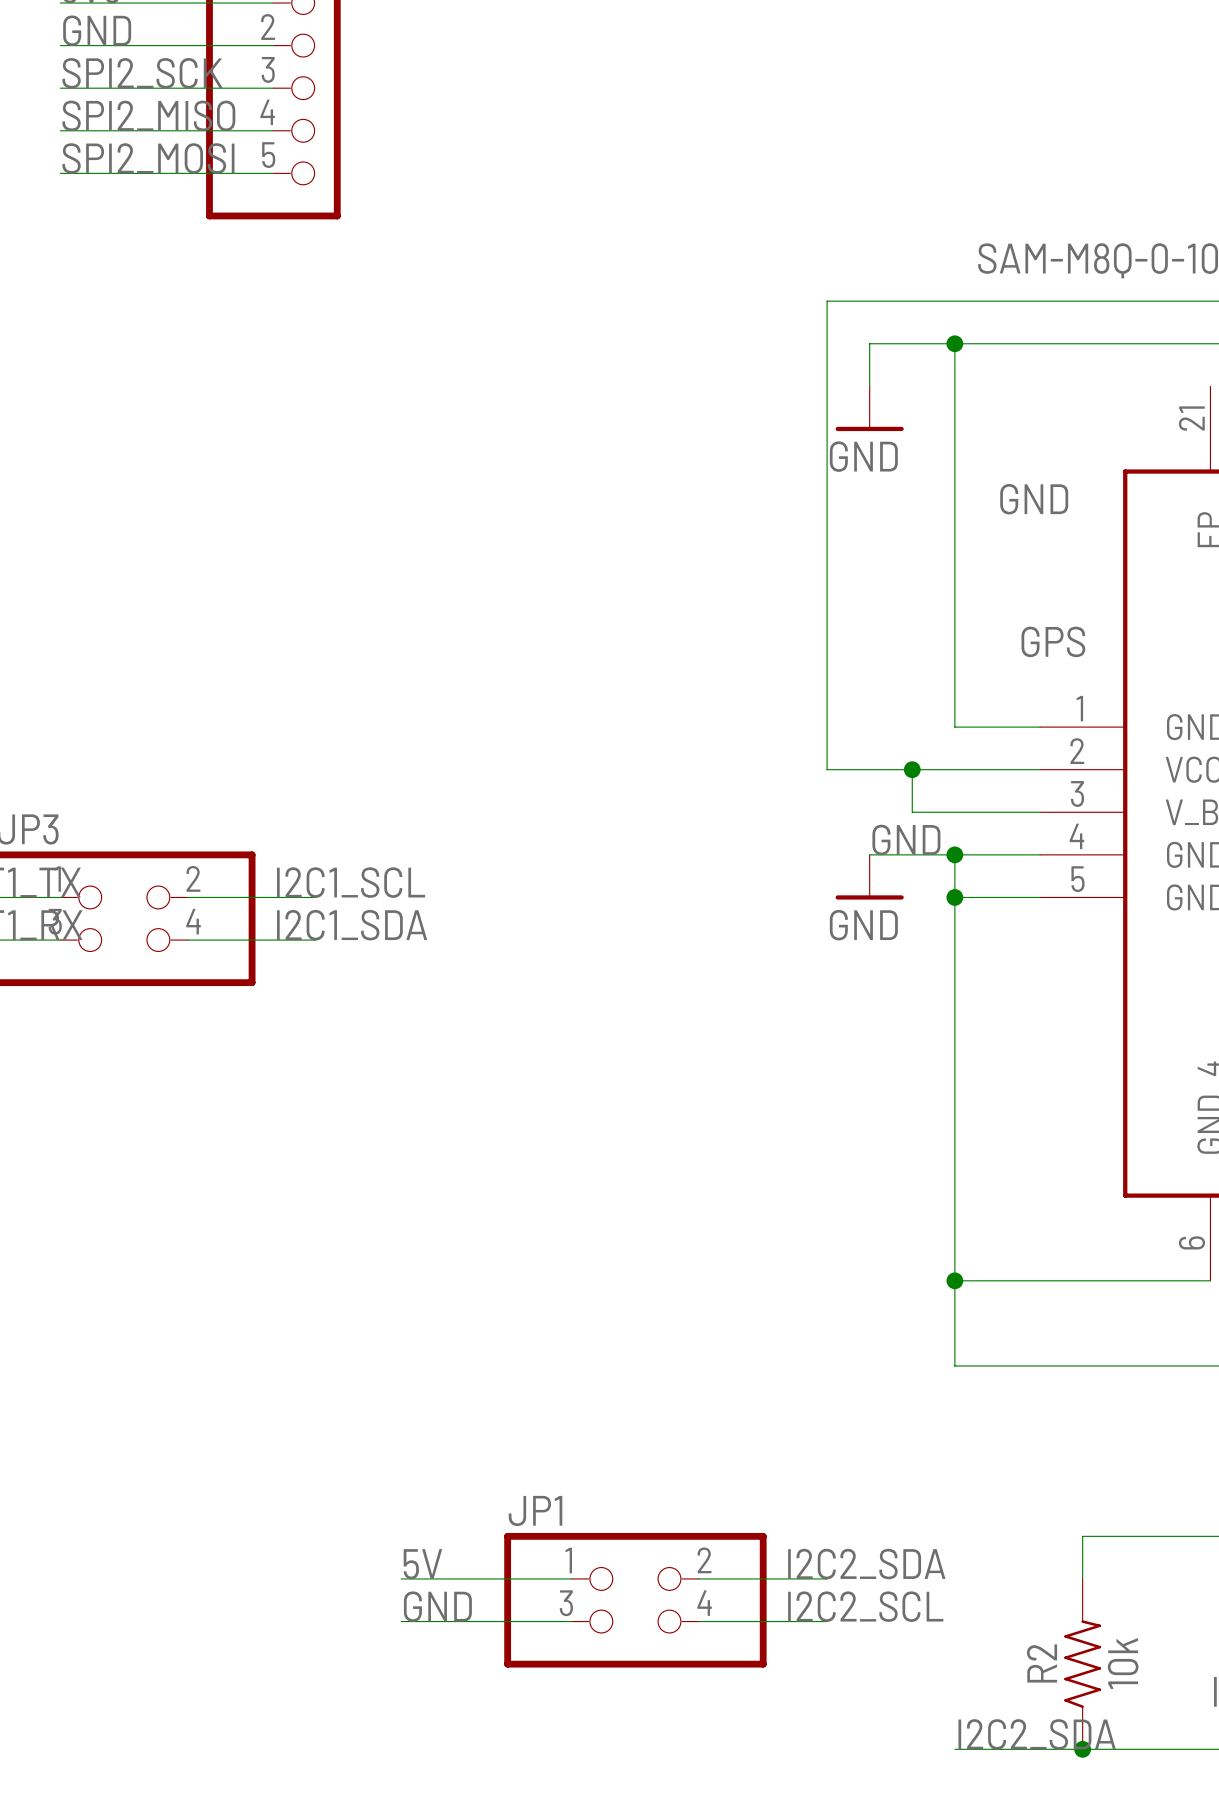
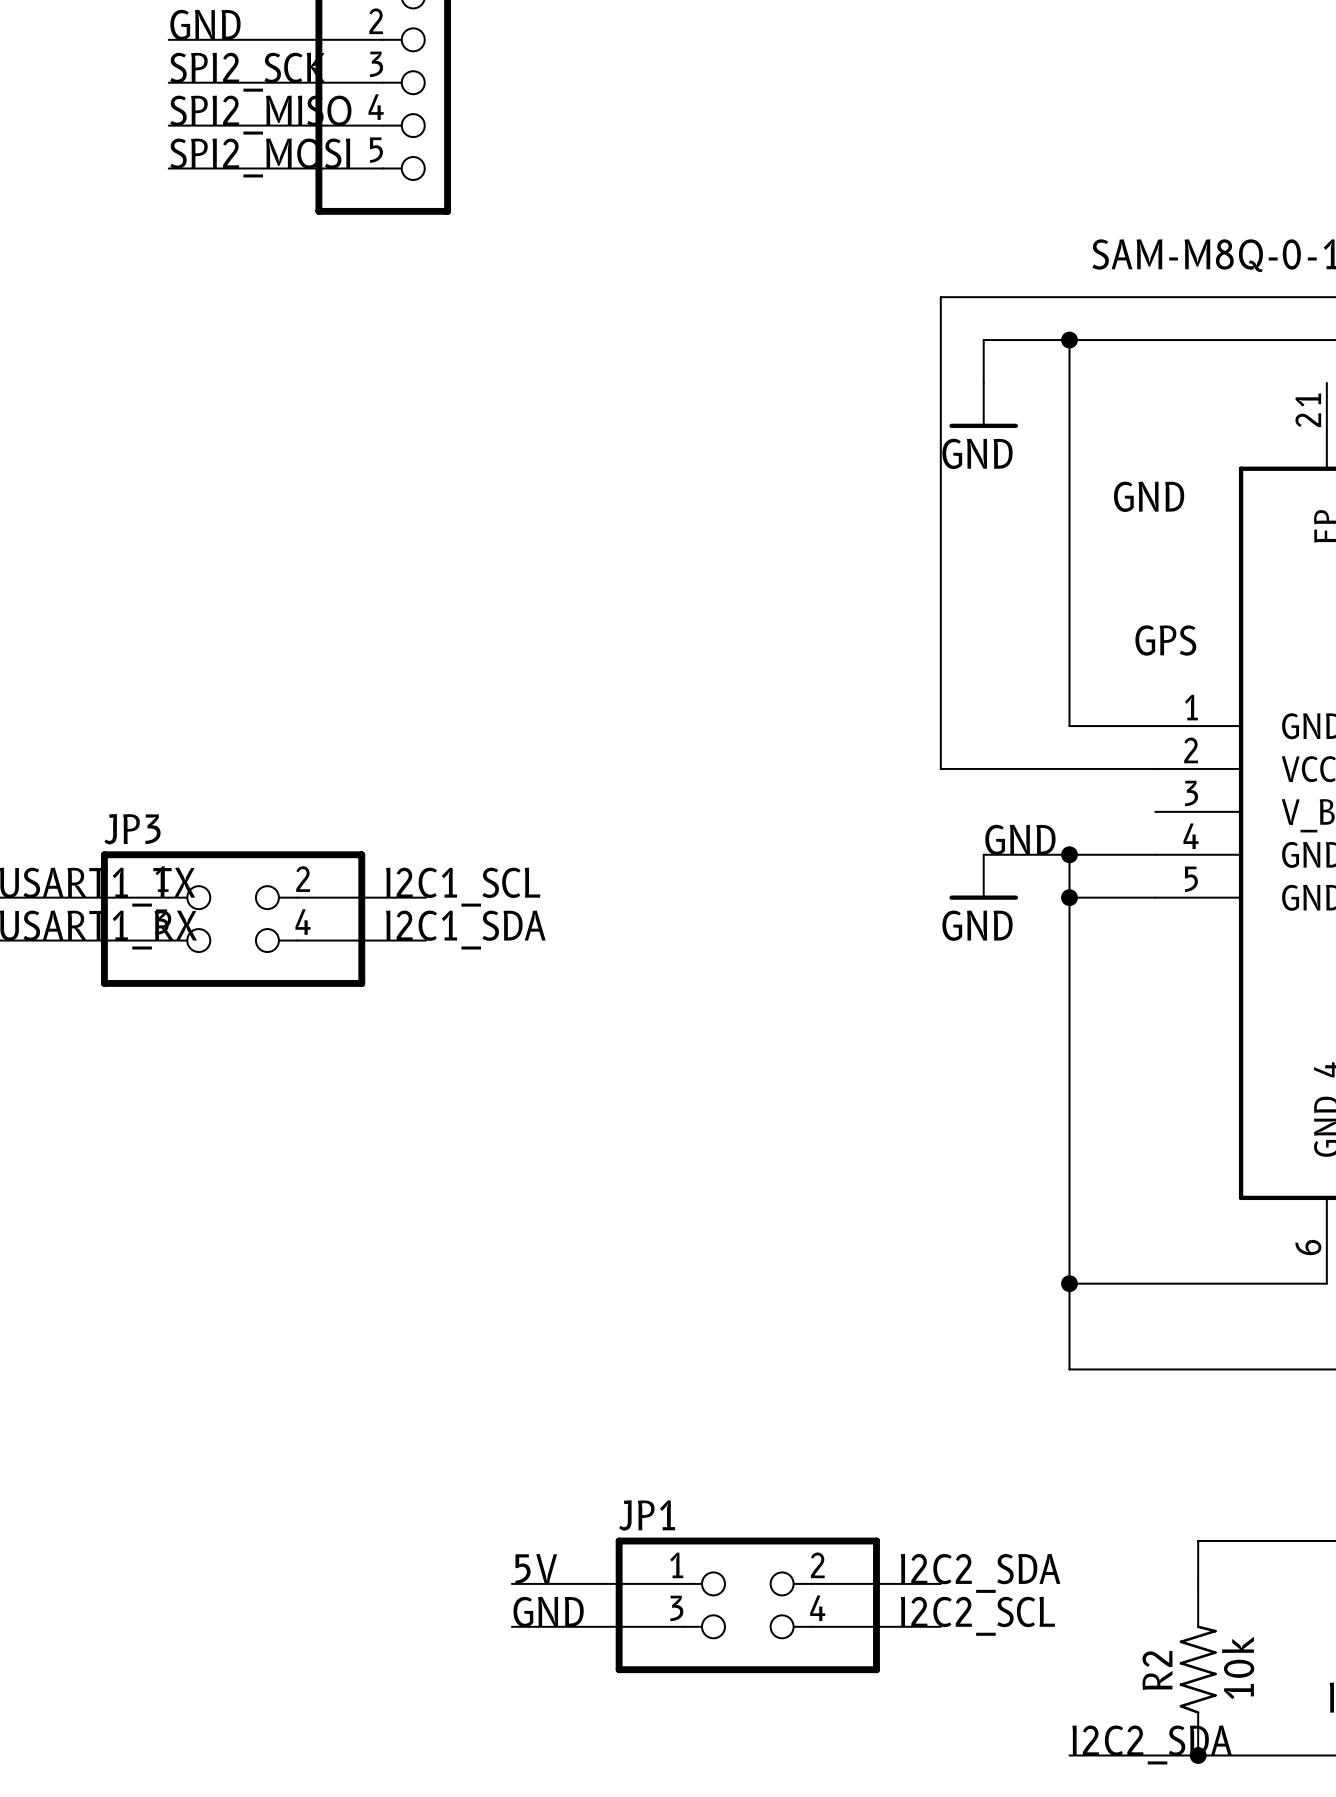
wire: (912, 769) (912, 812) (1040, 812) -> none
junction: (912, 769) -> none

